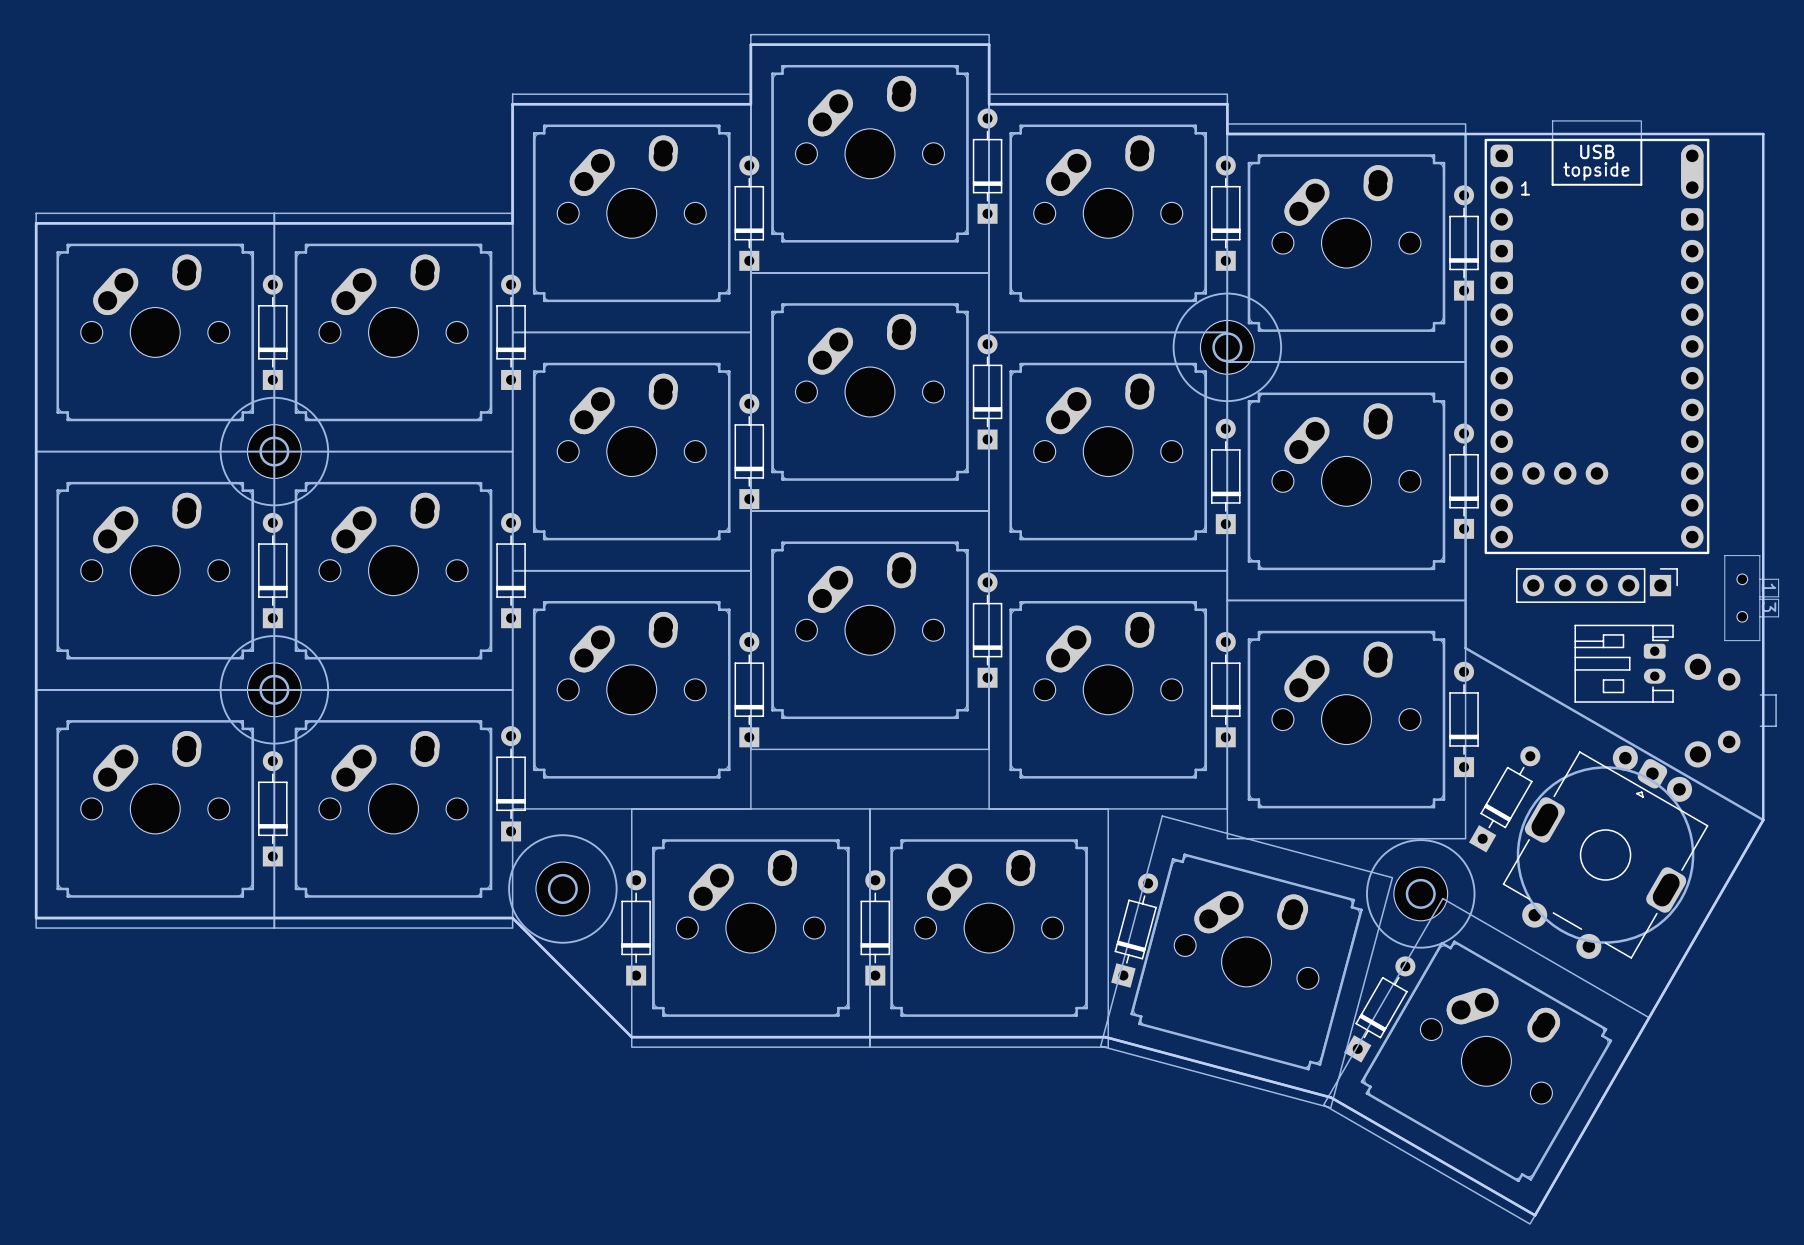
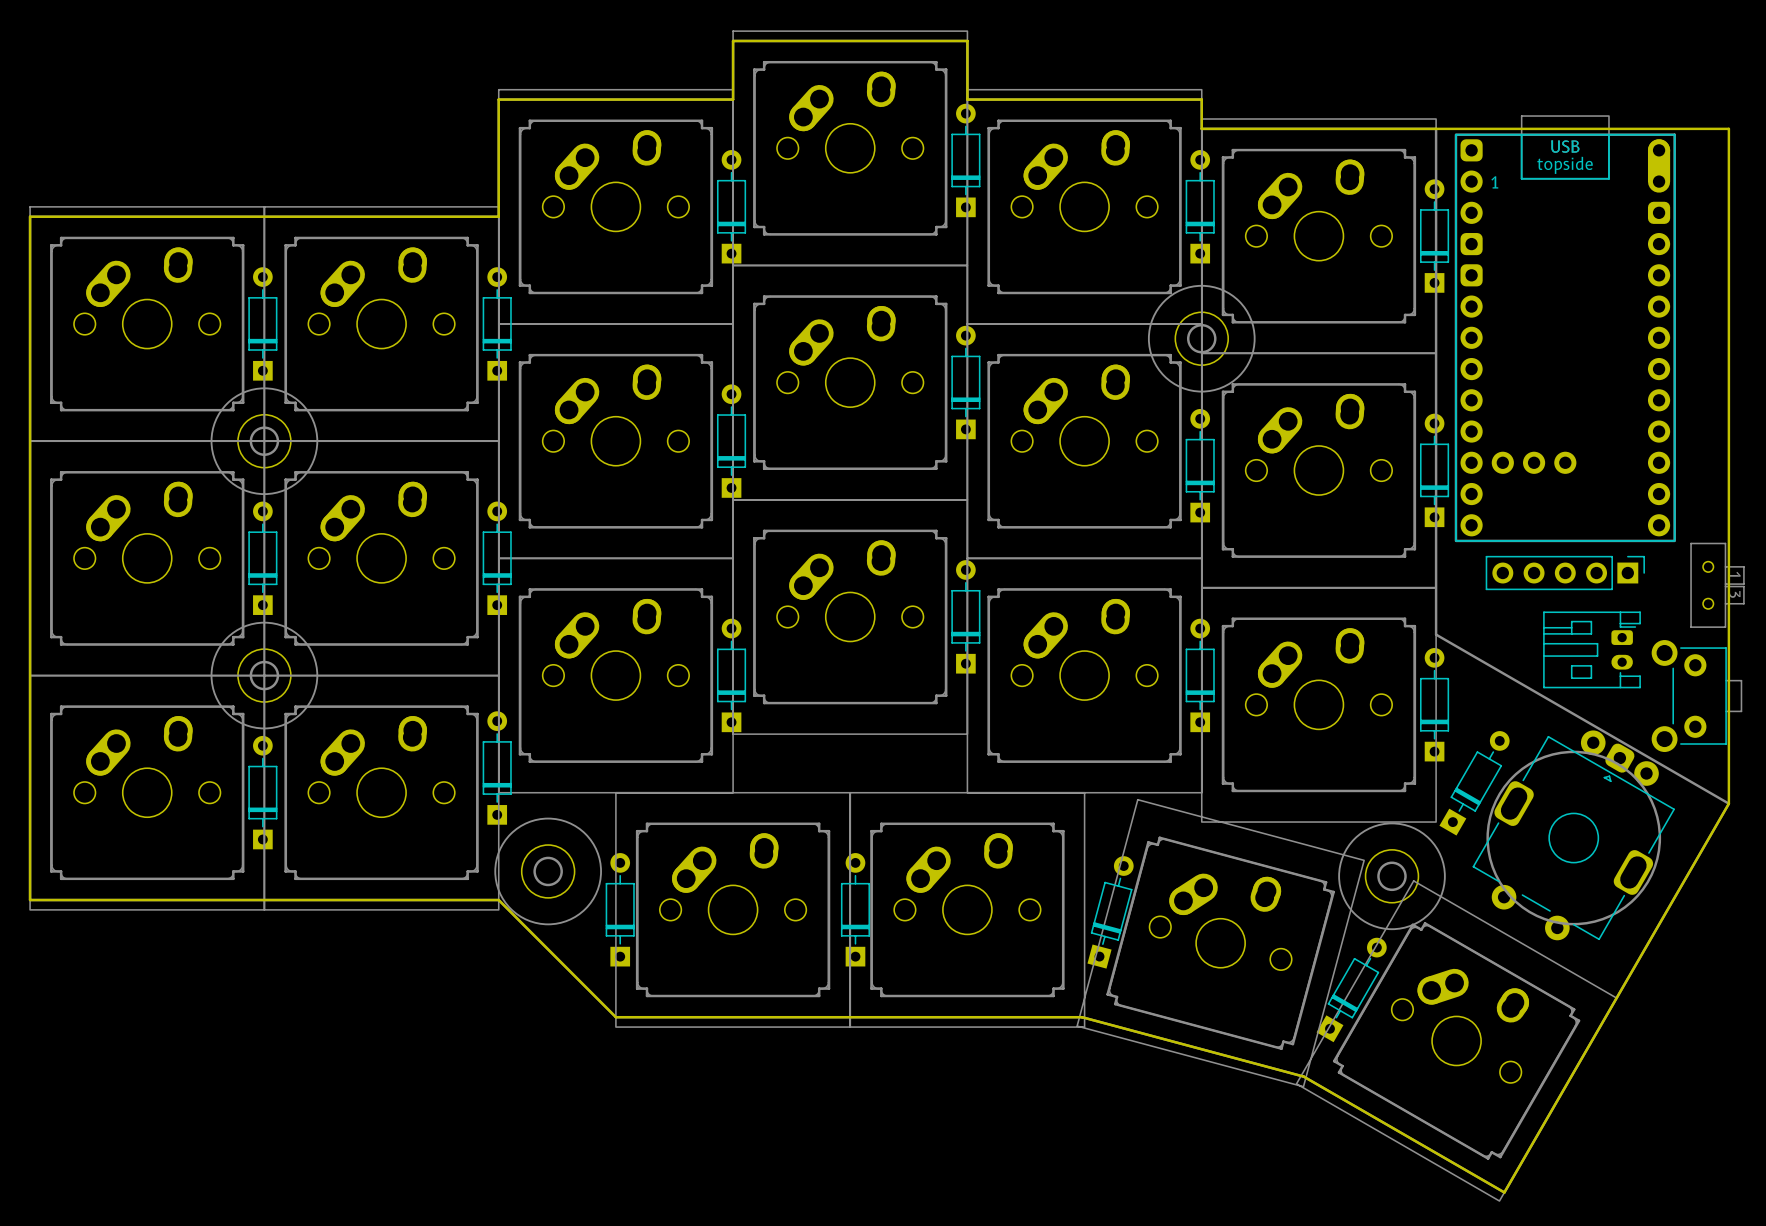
part side: bottom (1730, 710) -> top (1696, 696)

